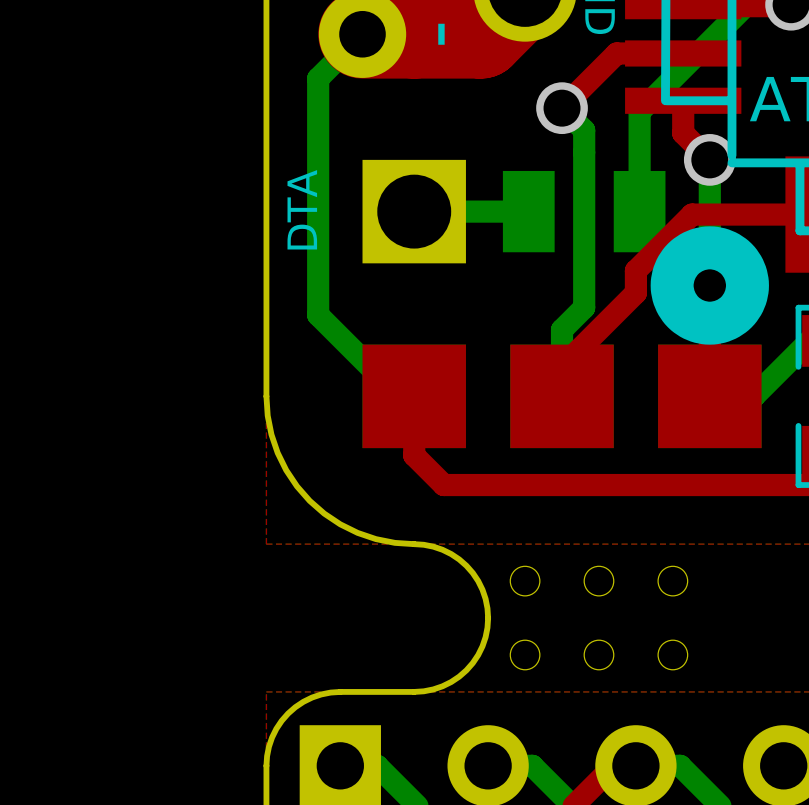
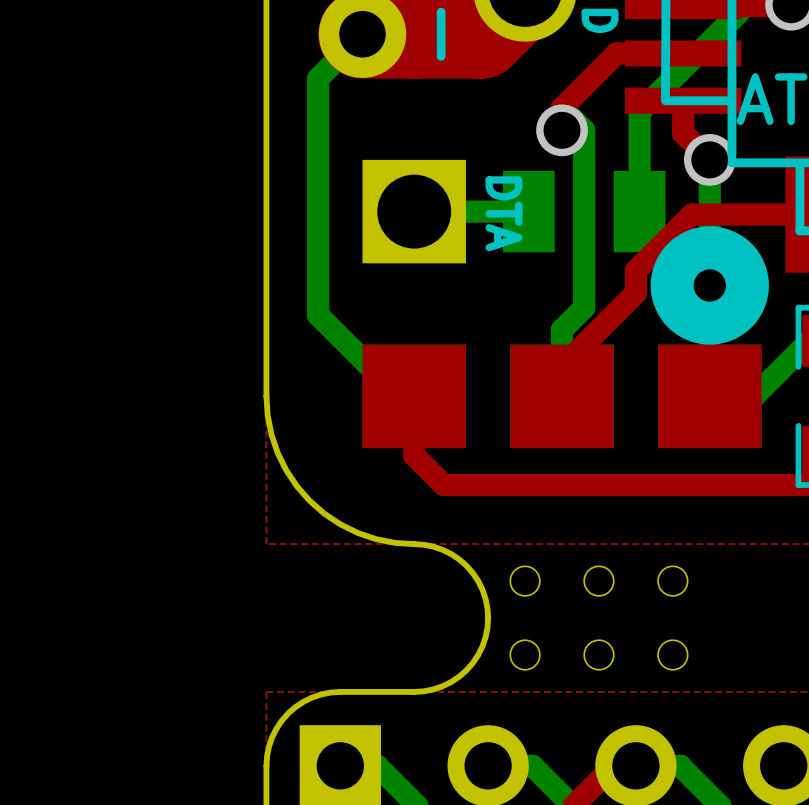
via position: (562, 108) -> (562, 130)
text rotation: 0° (302, 209) -> 180° (504, 213)
text position: DTA (302, 209) -> DTA (504, 213)

